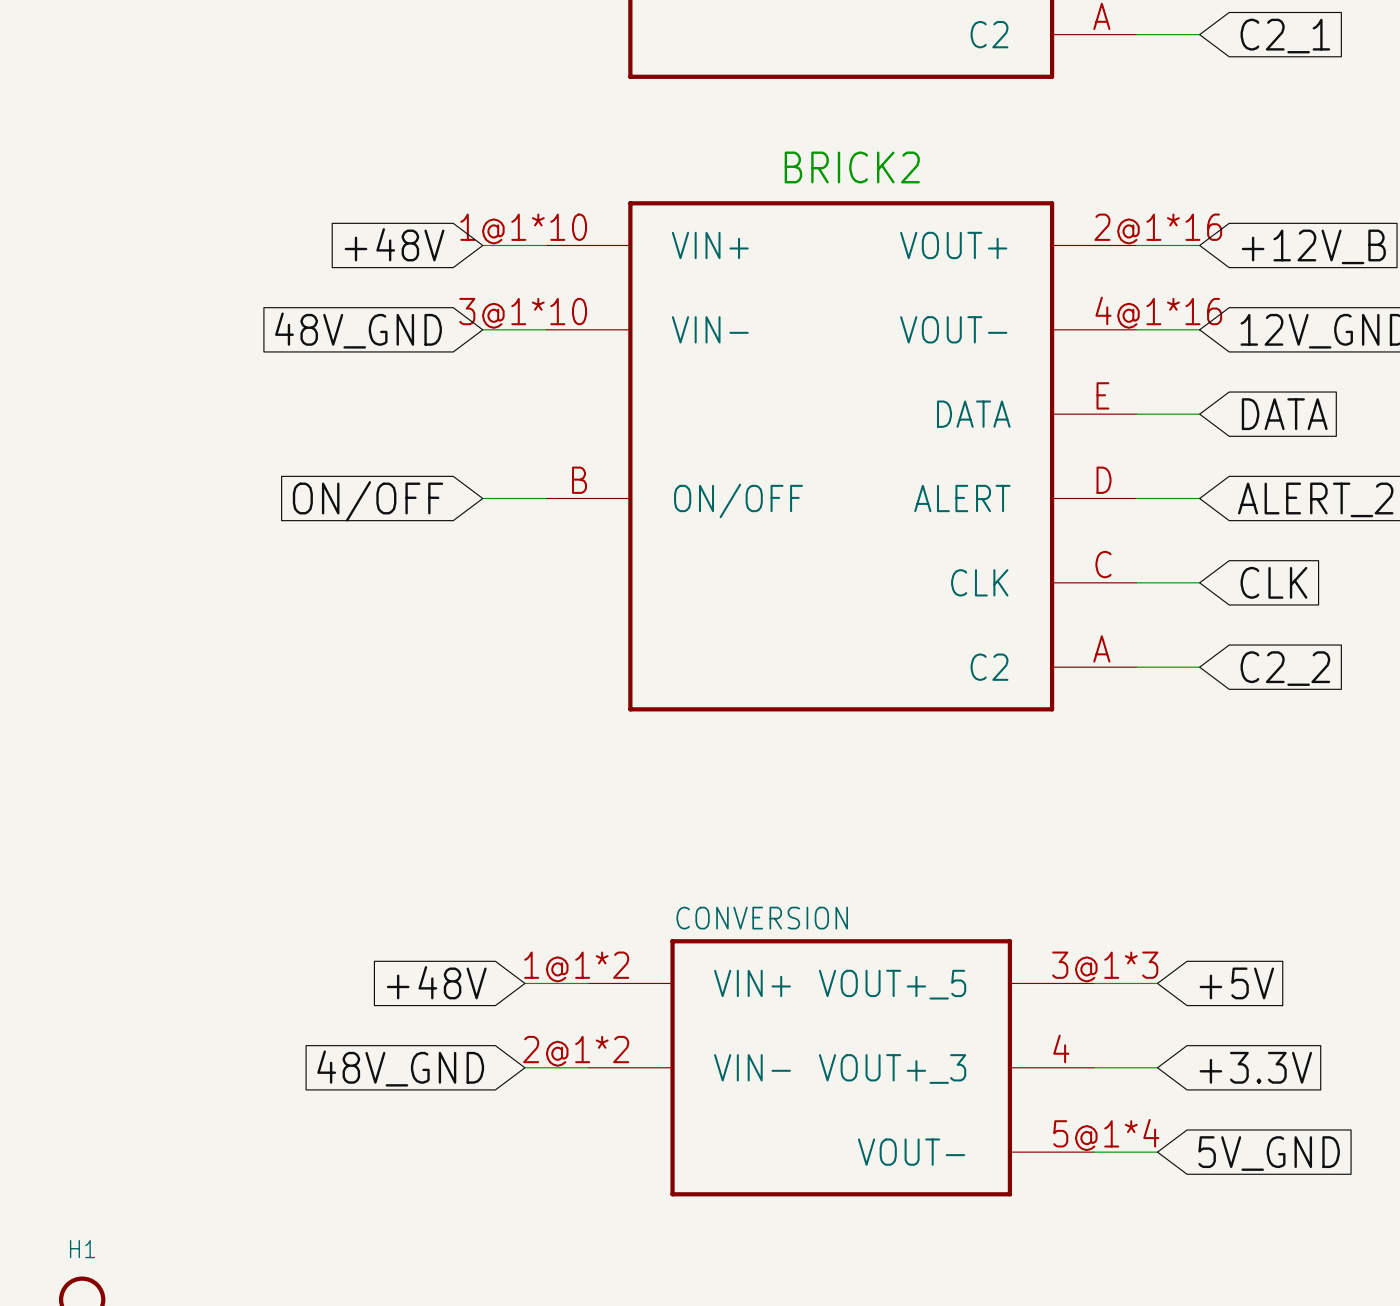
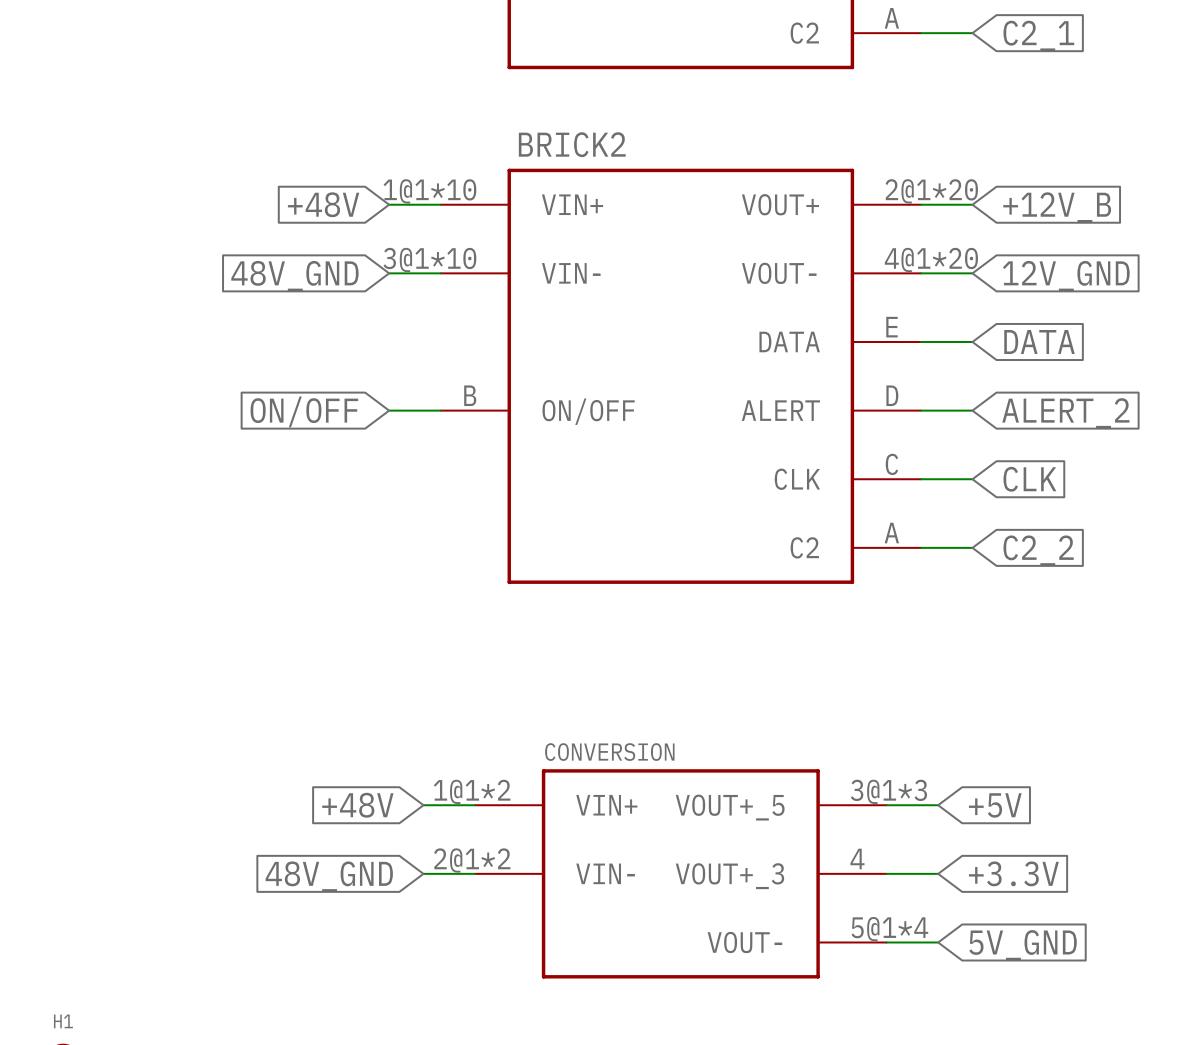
text: BRICK2 (852, 167) -> none
BRICK2 name: none -> BRICK2 (572, 144)
BRICK2 pin number: 2@1*16 (1158, 229) -> 2@1*20 (931, 191)
BRICK2 pin number: 4@1*16 (1158, 312) -> 4@1*20 (931, 259)

